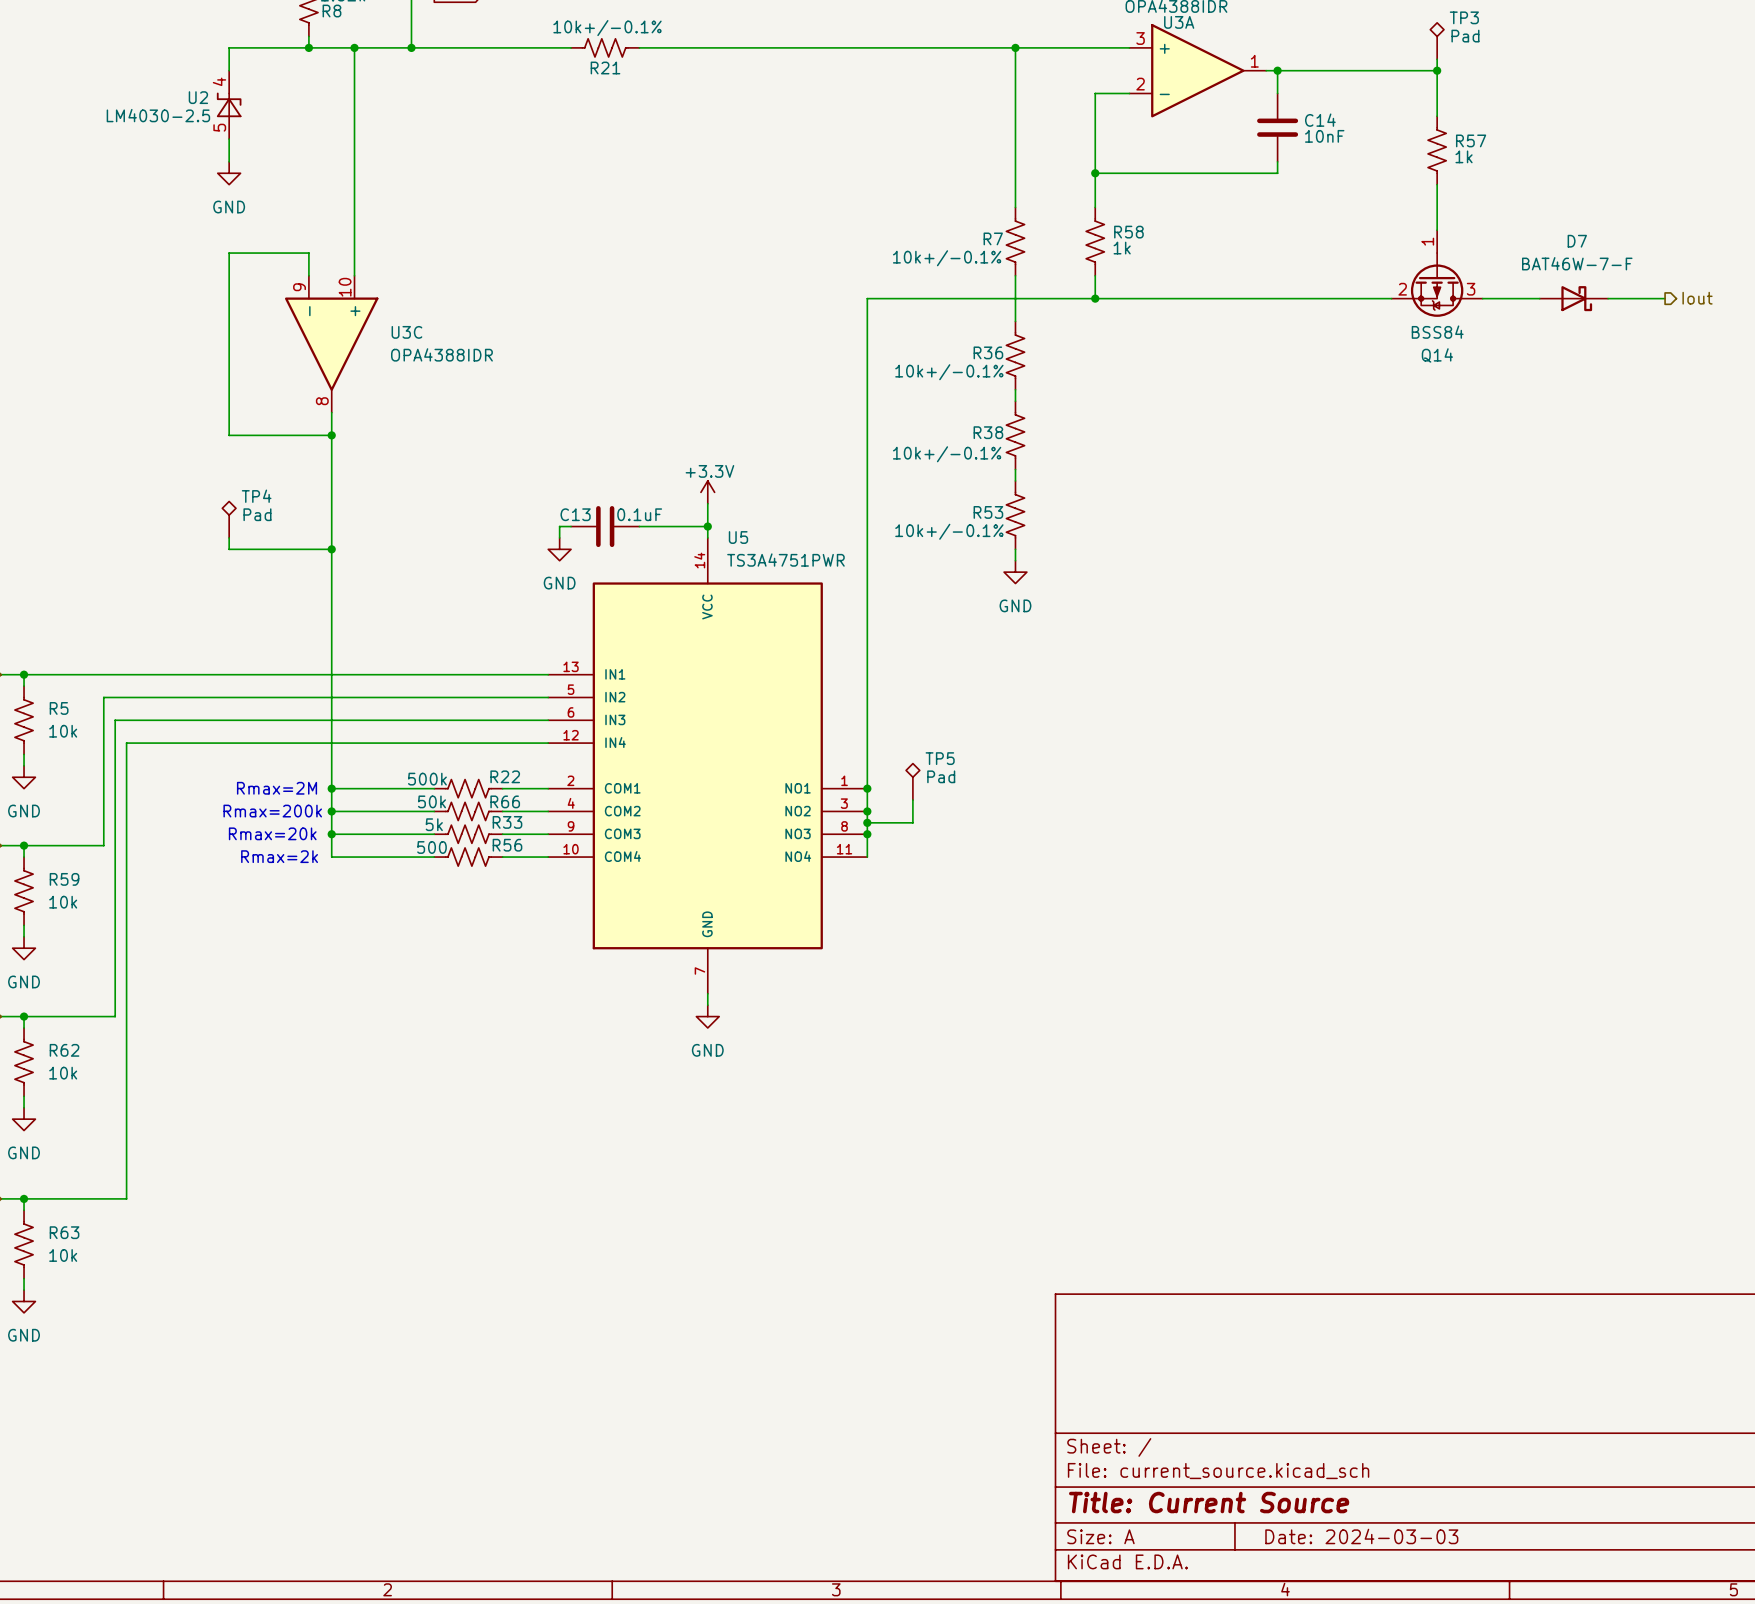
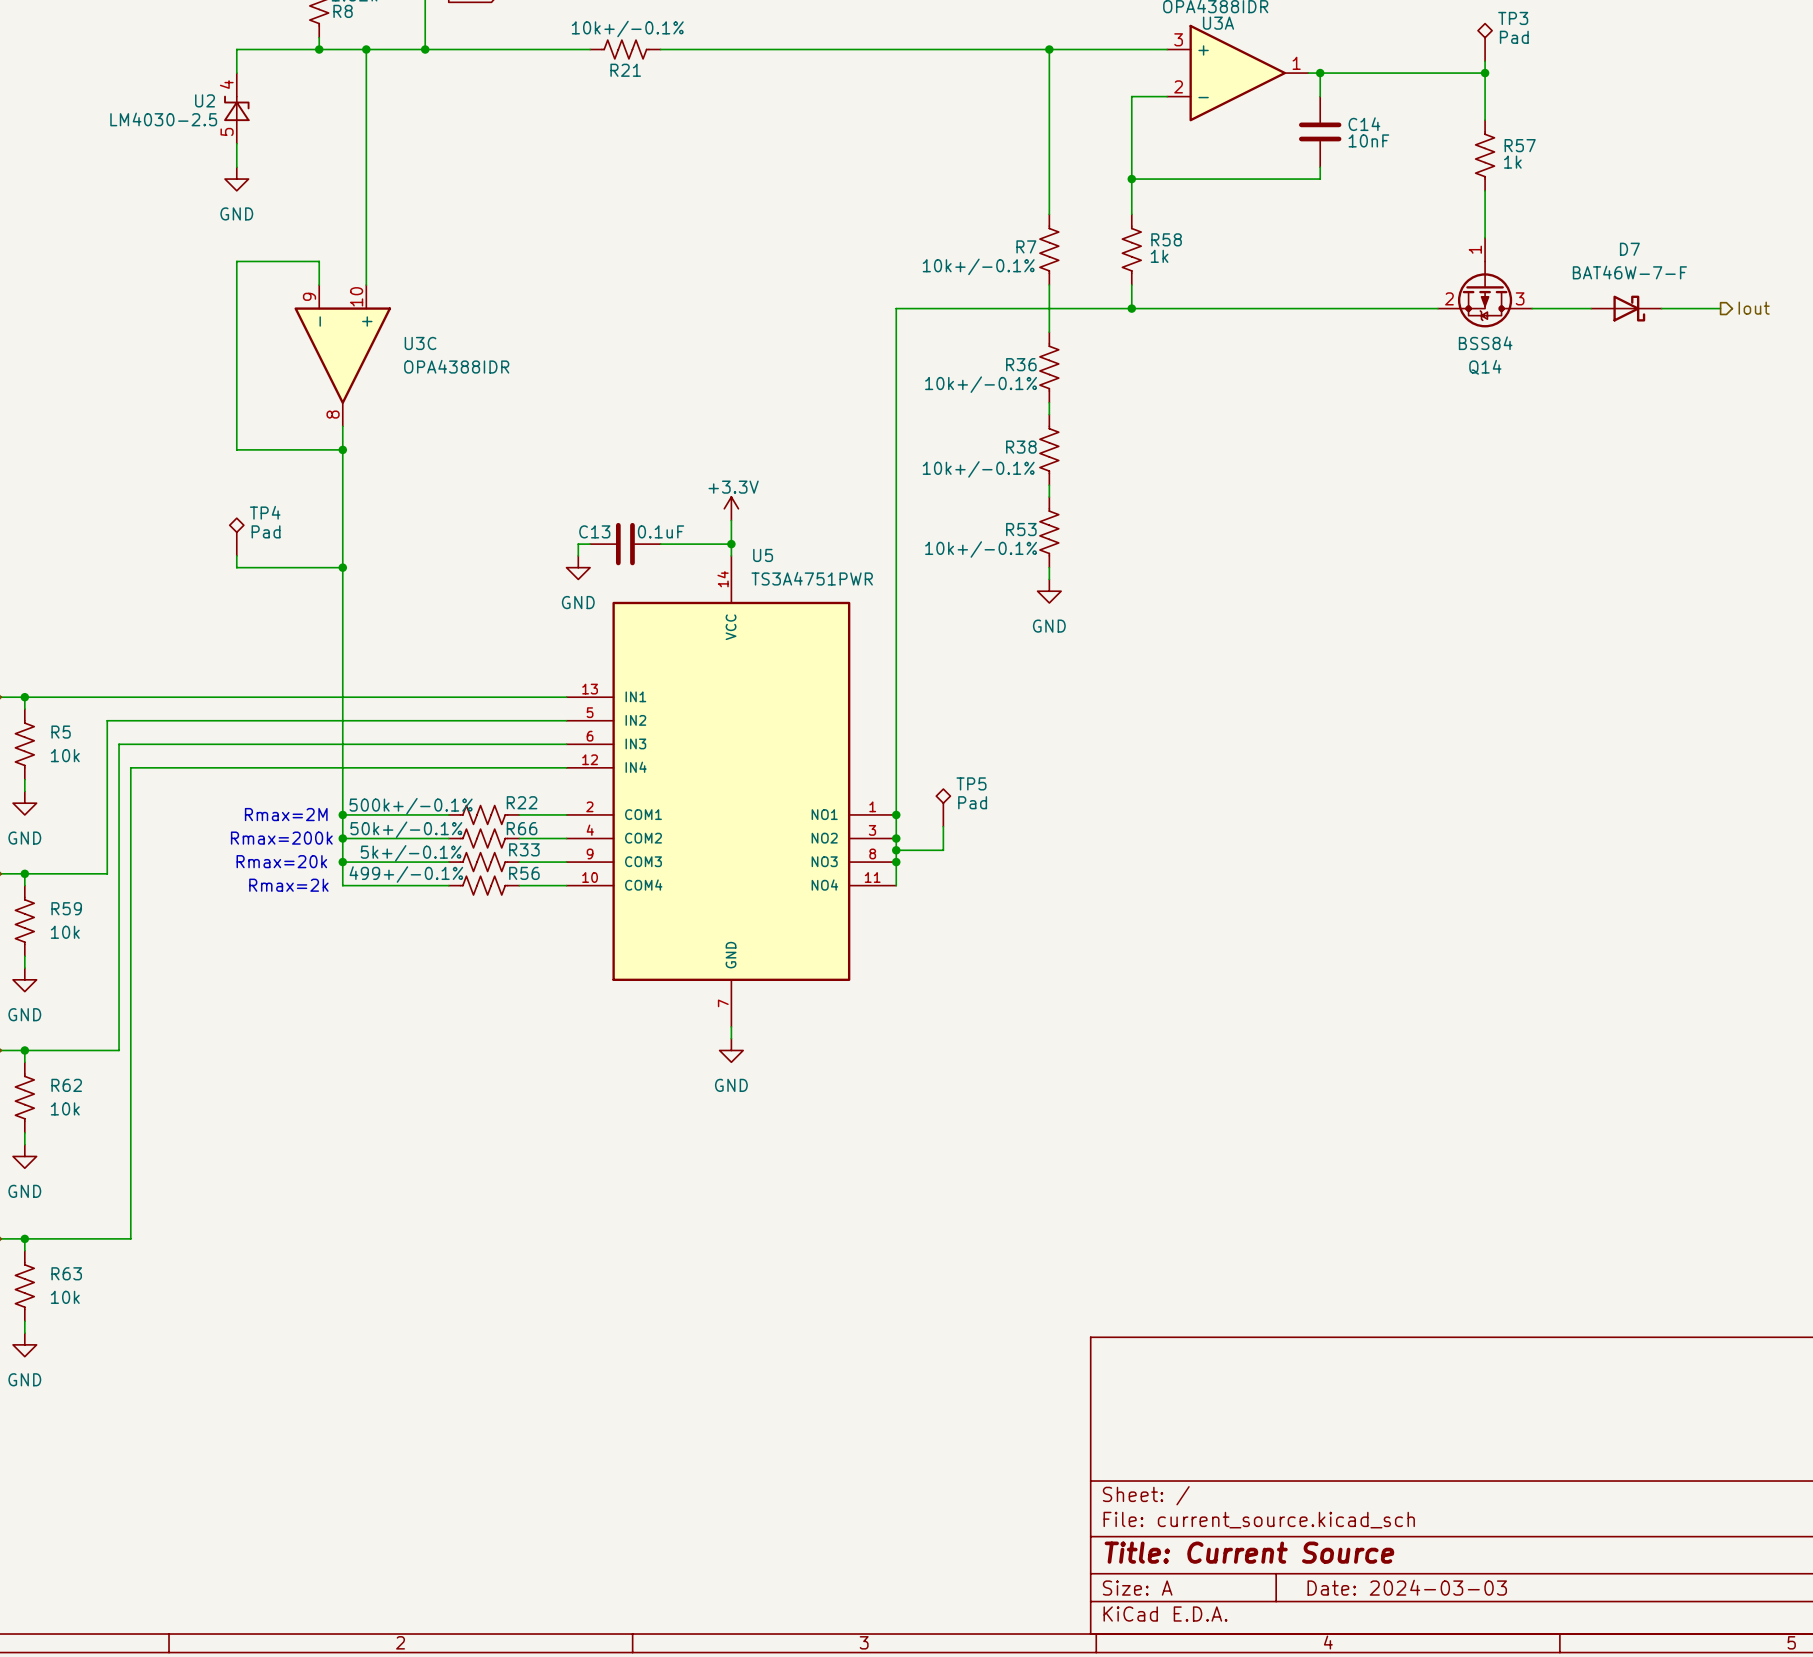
R22 value: 500k (427, 779) -> 500k+/-0.1% (411, 806)
R66 value: 50k (432, 801) -> 50k+/-0.1% (406, 829)
R33 value: 5k (434, 824) -> 5k+/-0.1% (411, 853)
R56 value: 500 (432, 847) -> 499+/-0.1% (406, 874)

